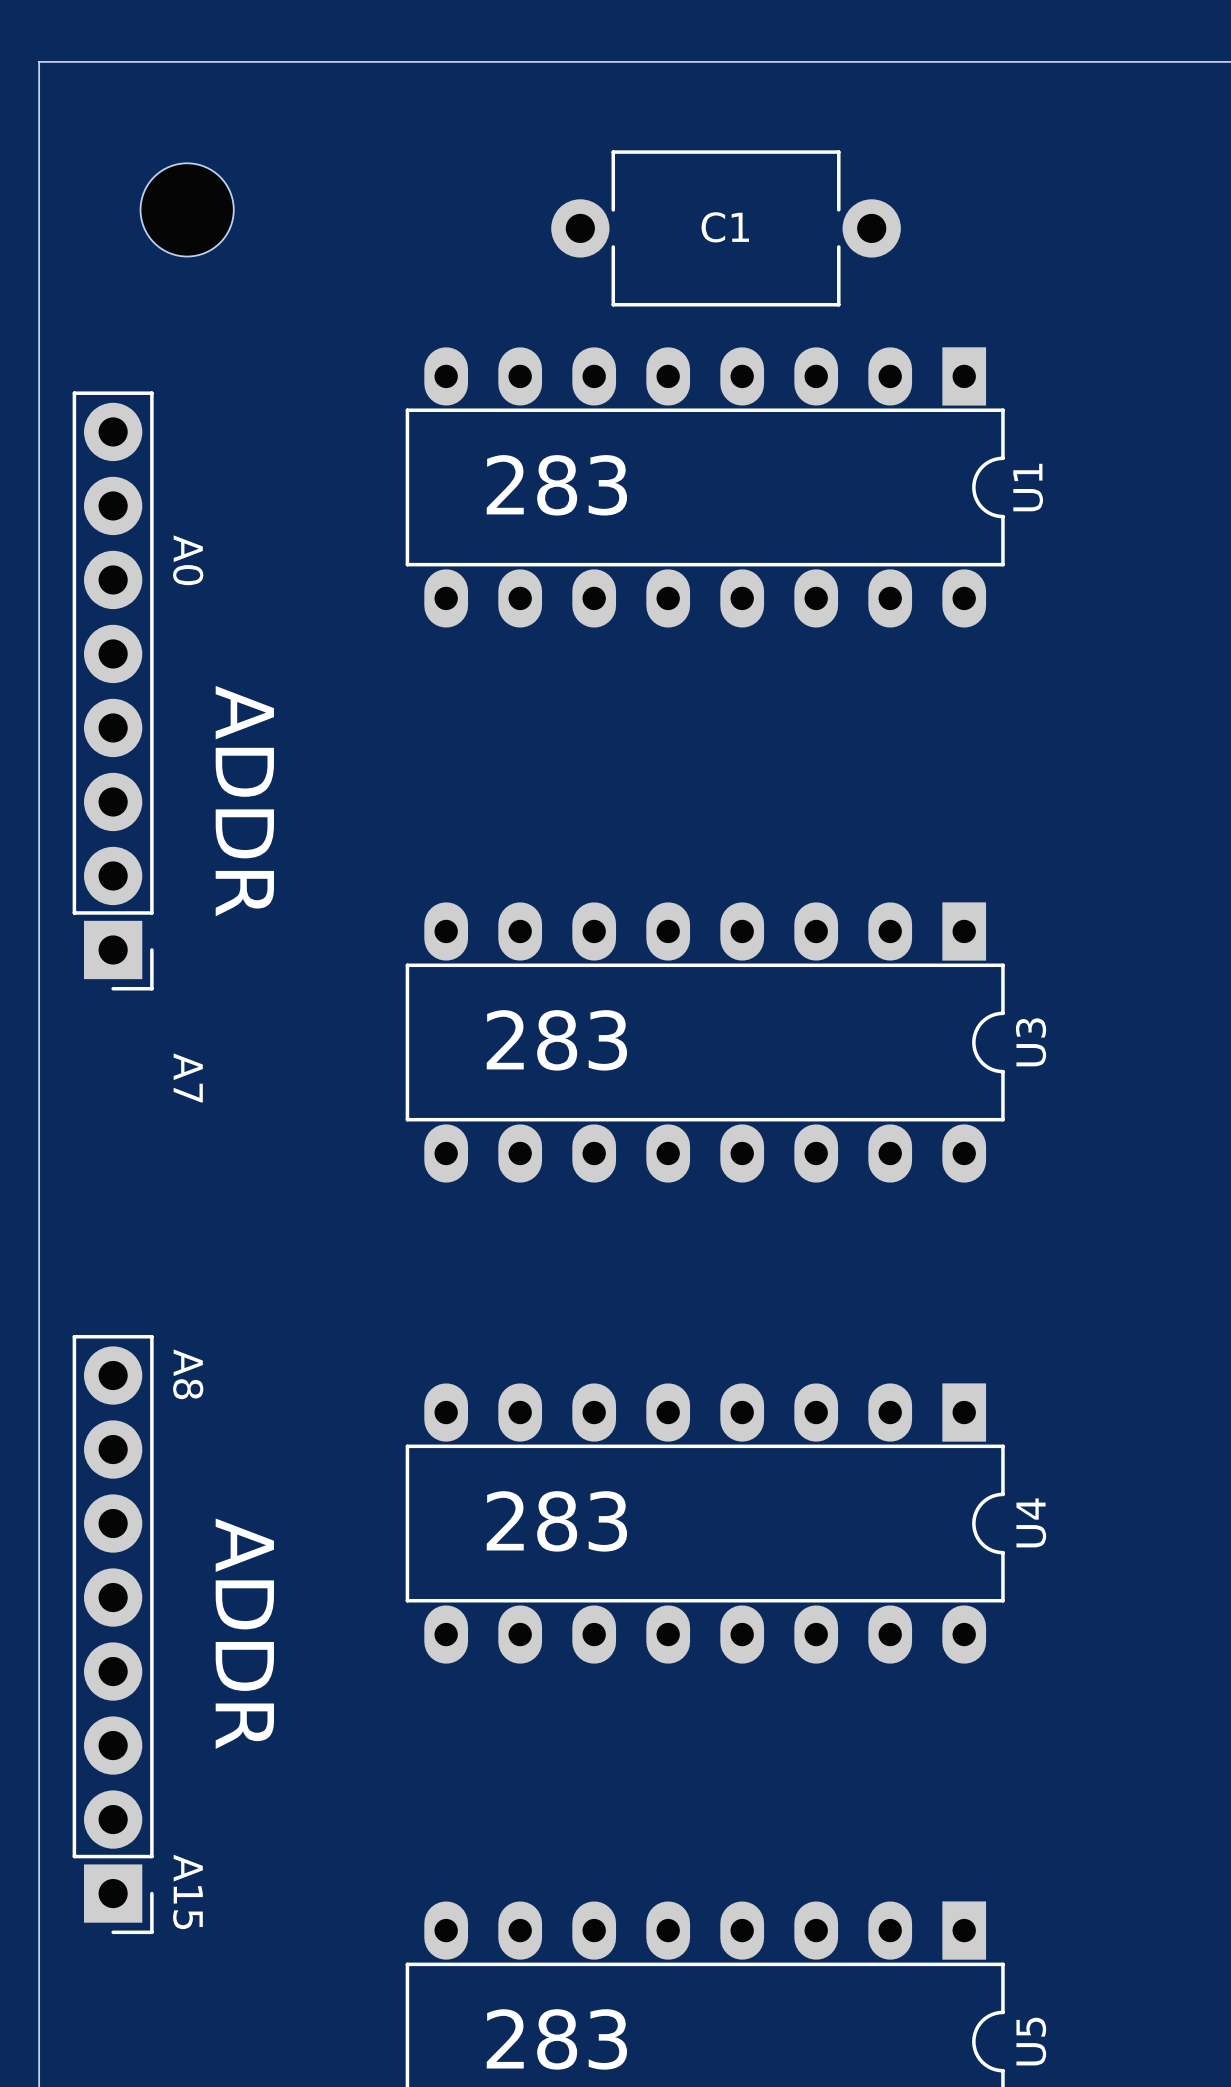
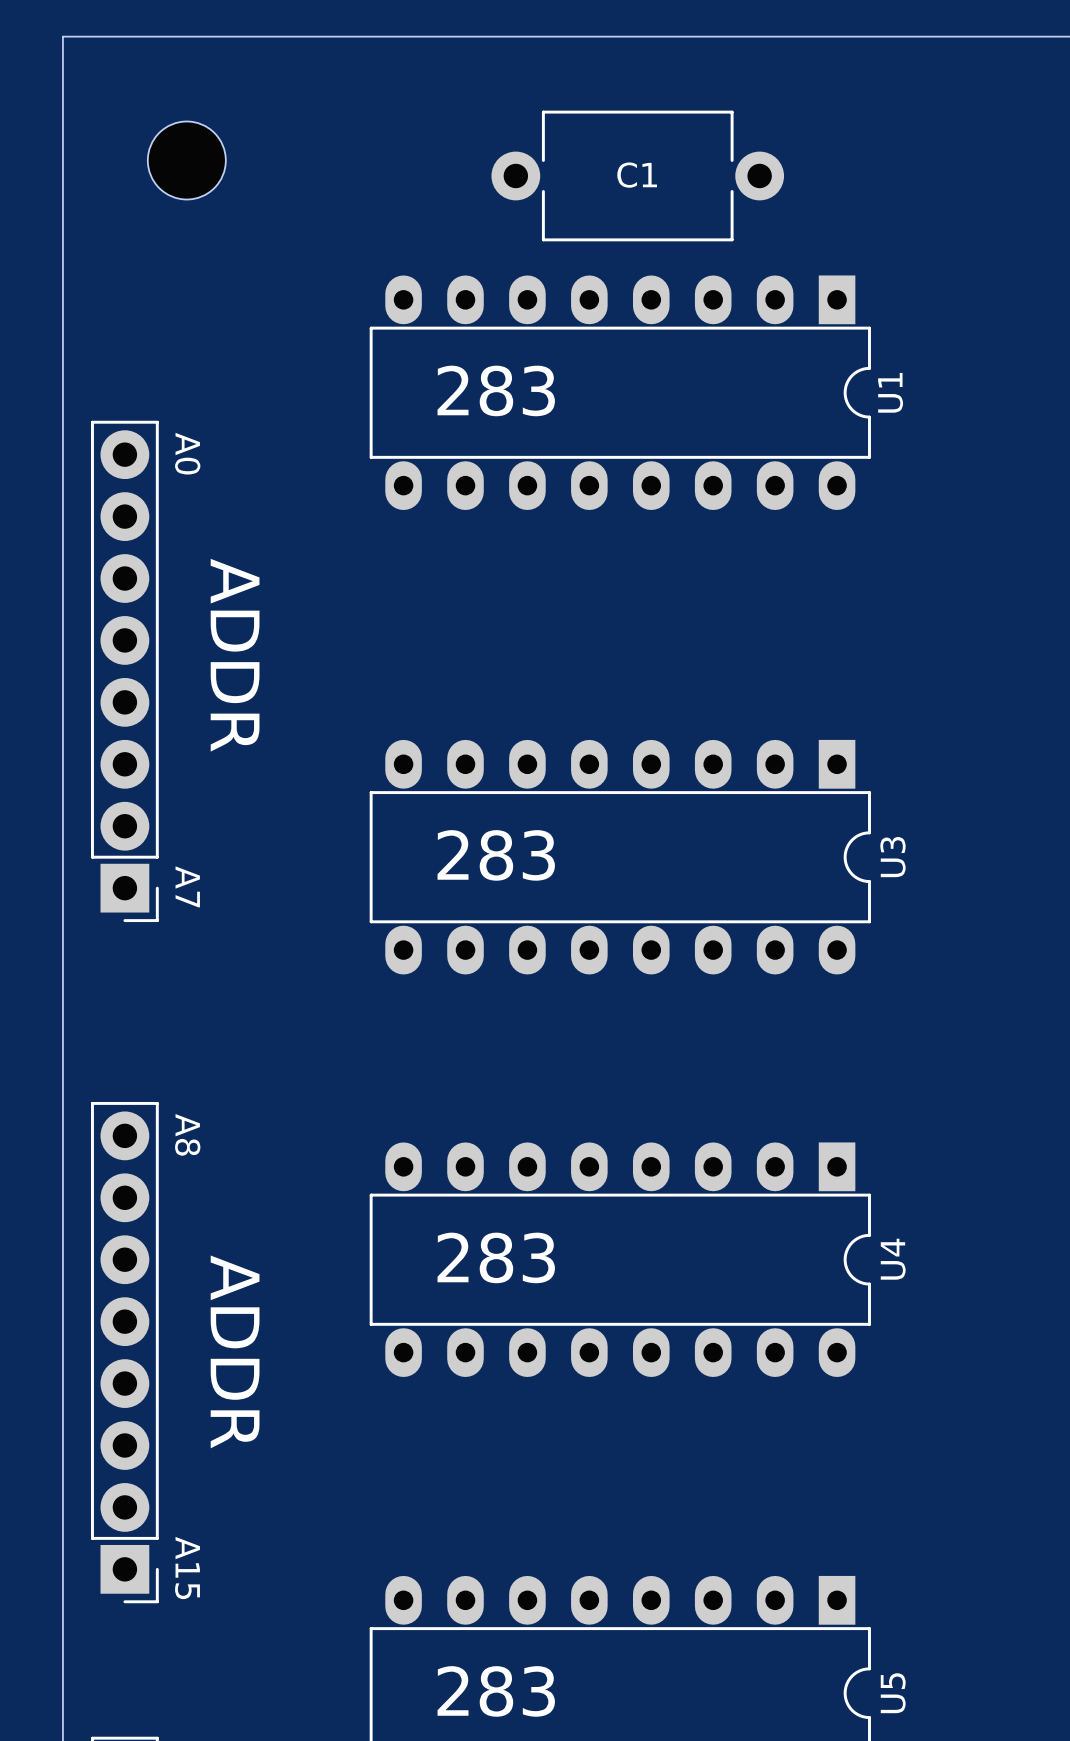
part position: (113, 690) -> (124, 671)

